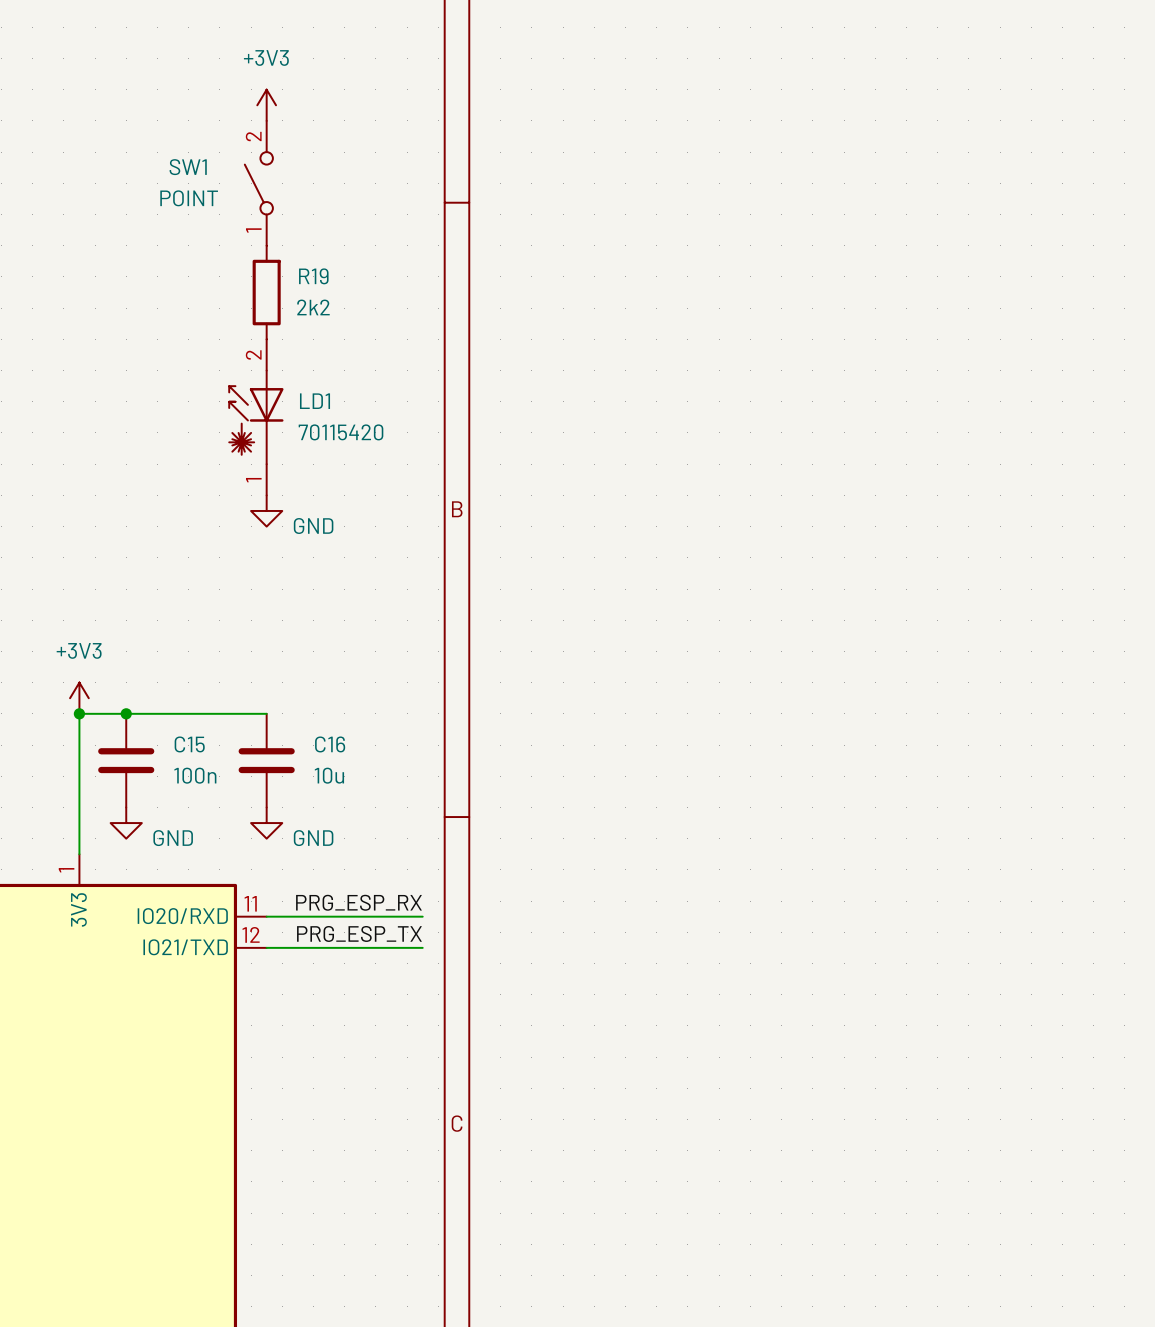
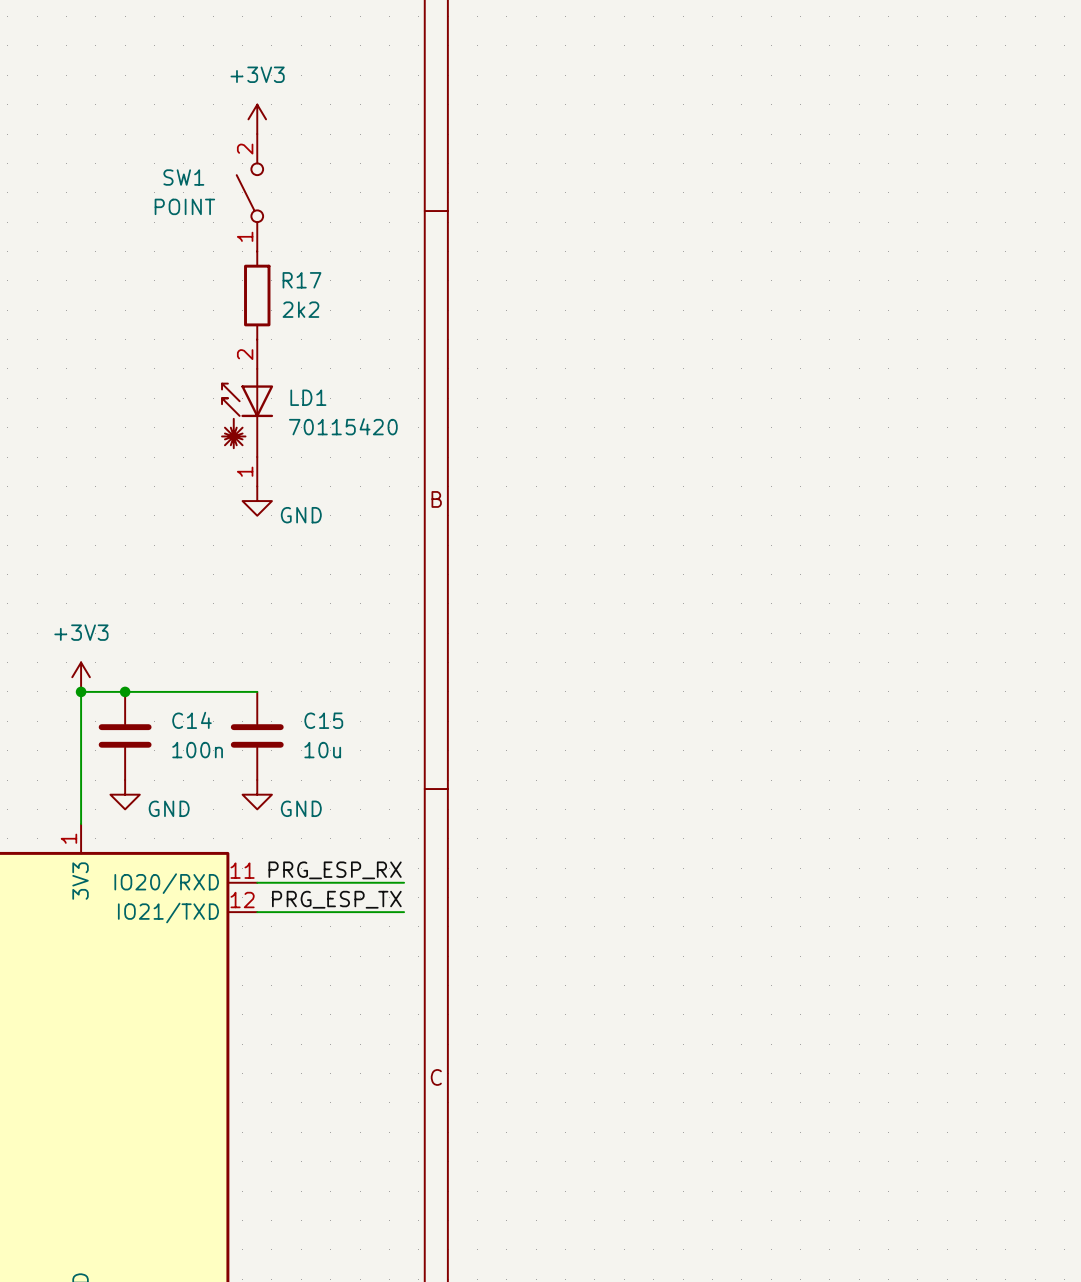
R19 name: R19 (313, 276) -> R17 (302, 280)
C15 name: C15 (189, 744) -> C14 (192, 720)
C16 name: C16 (330, 744) -> C15 (323, 720)

